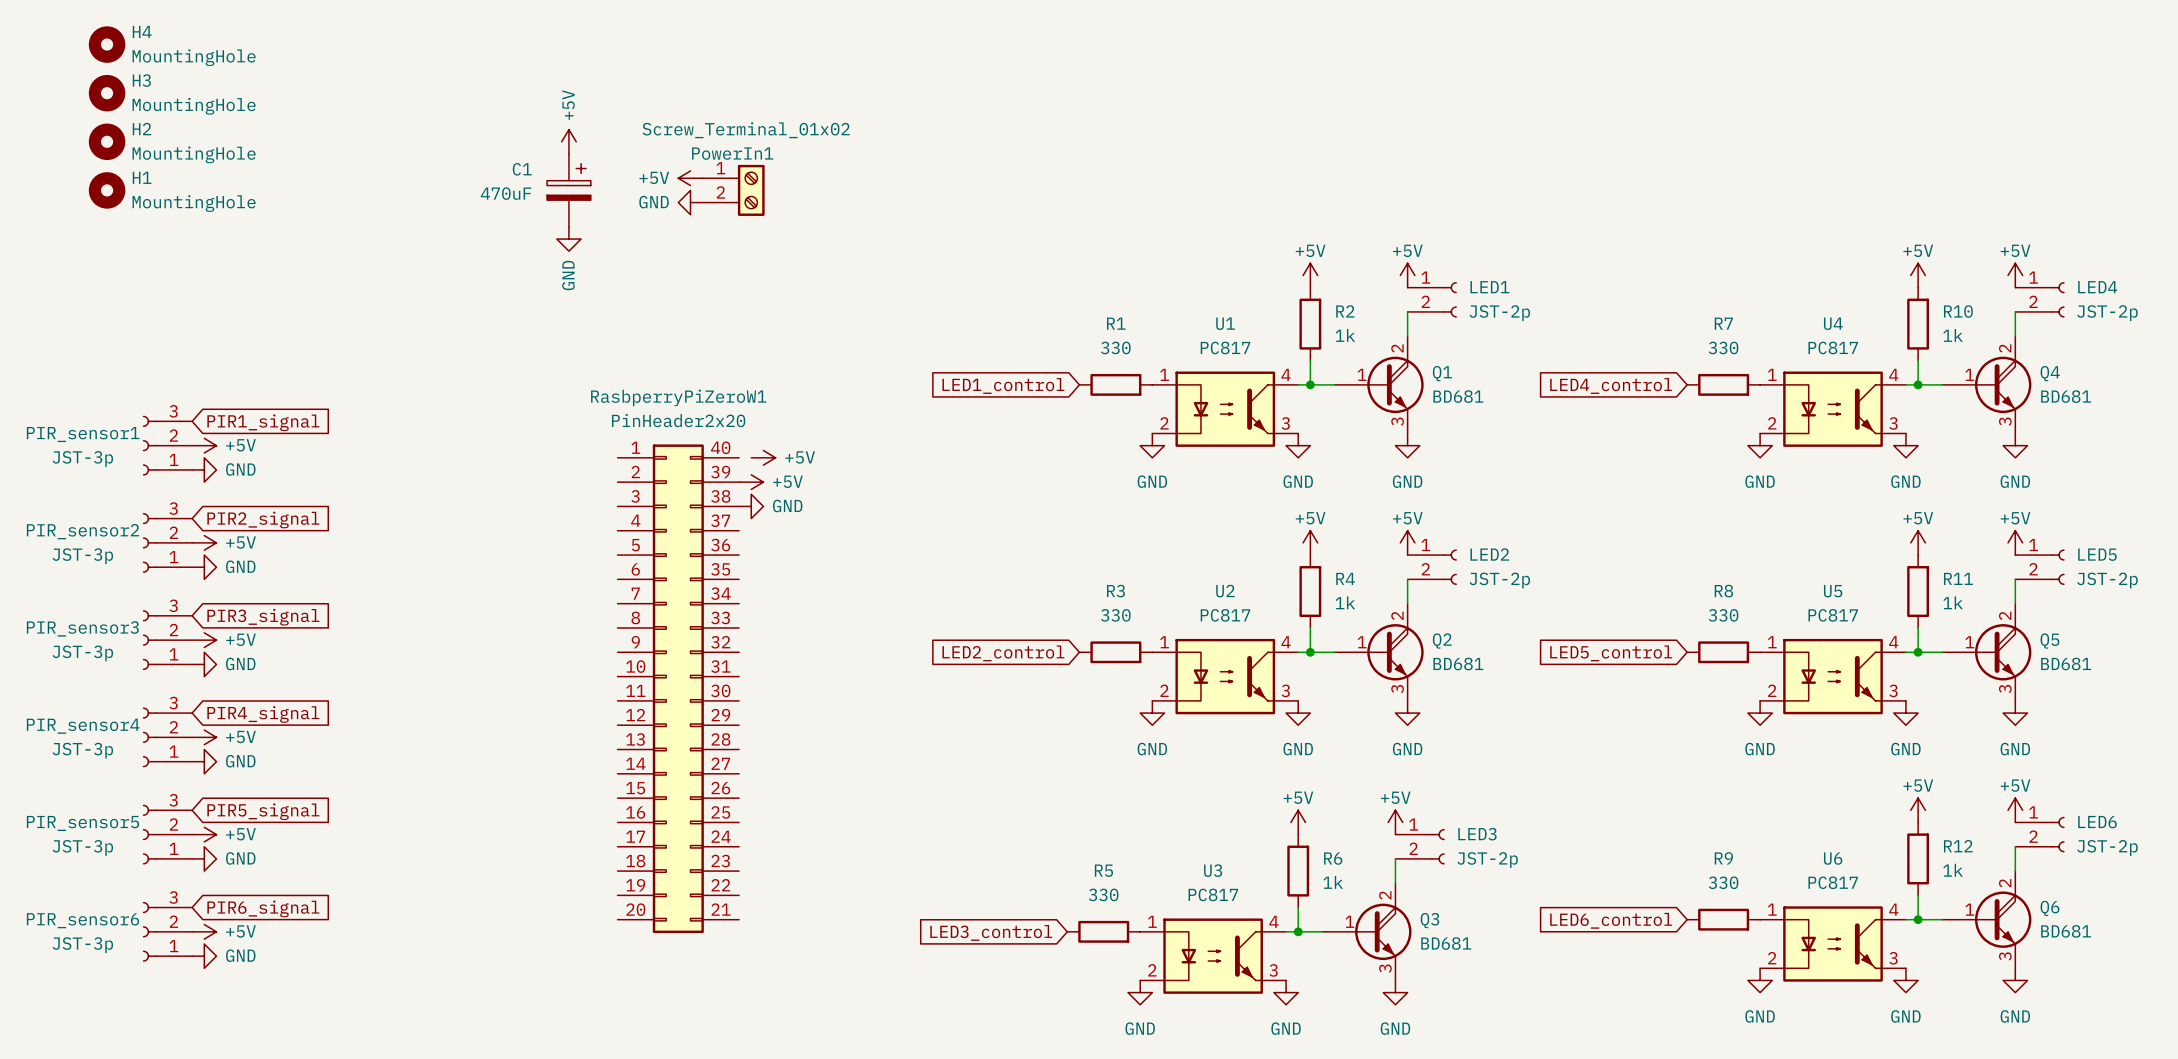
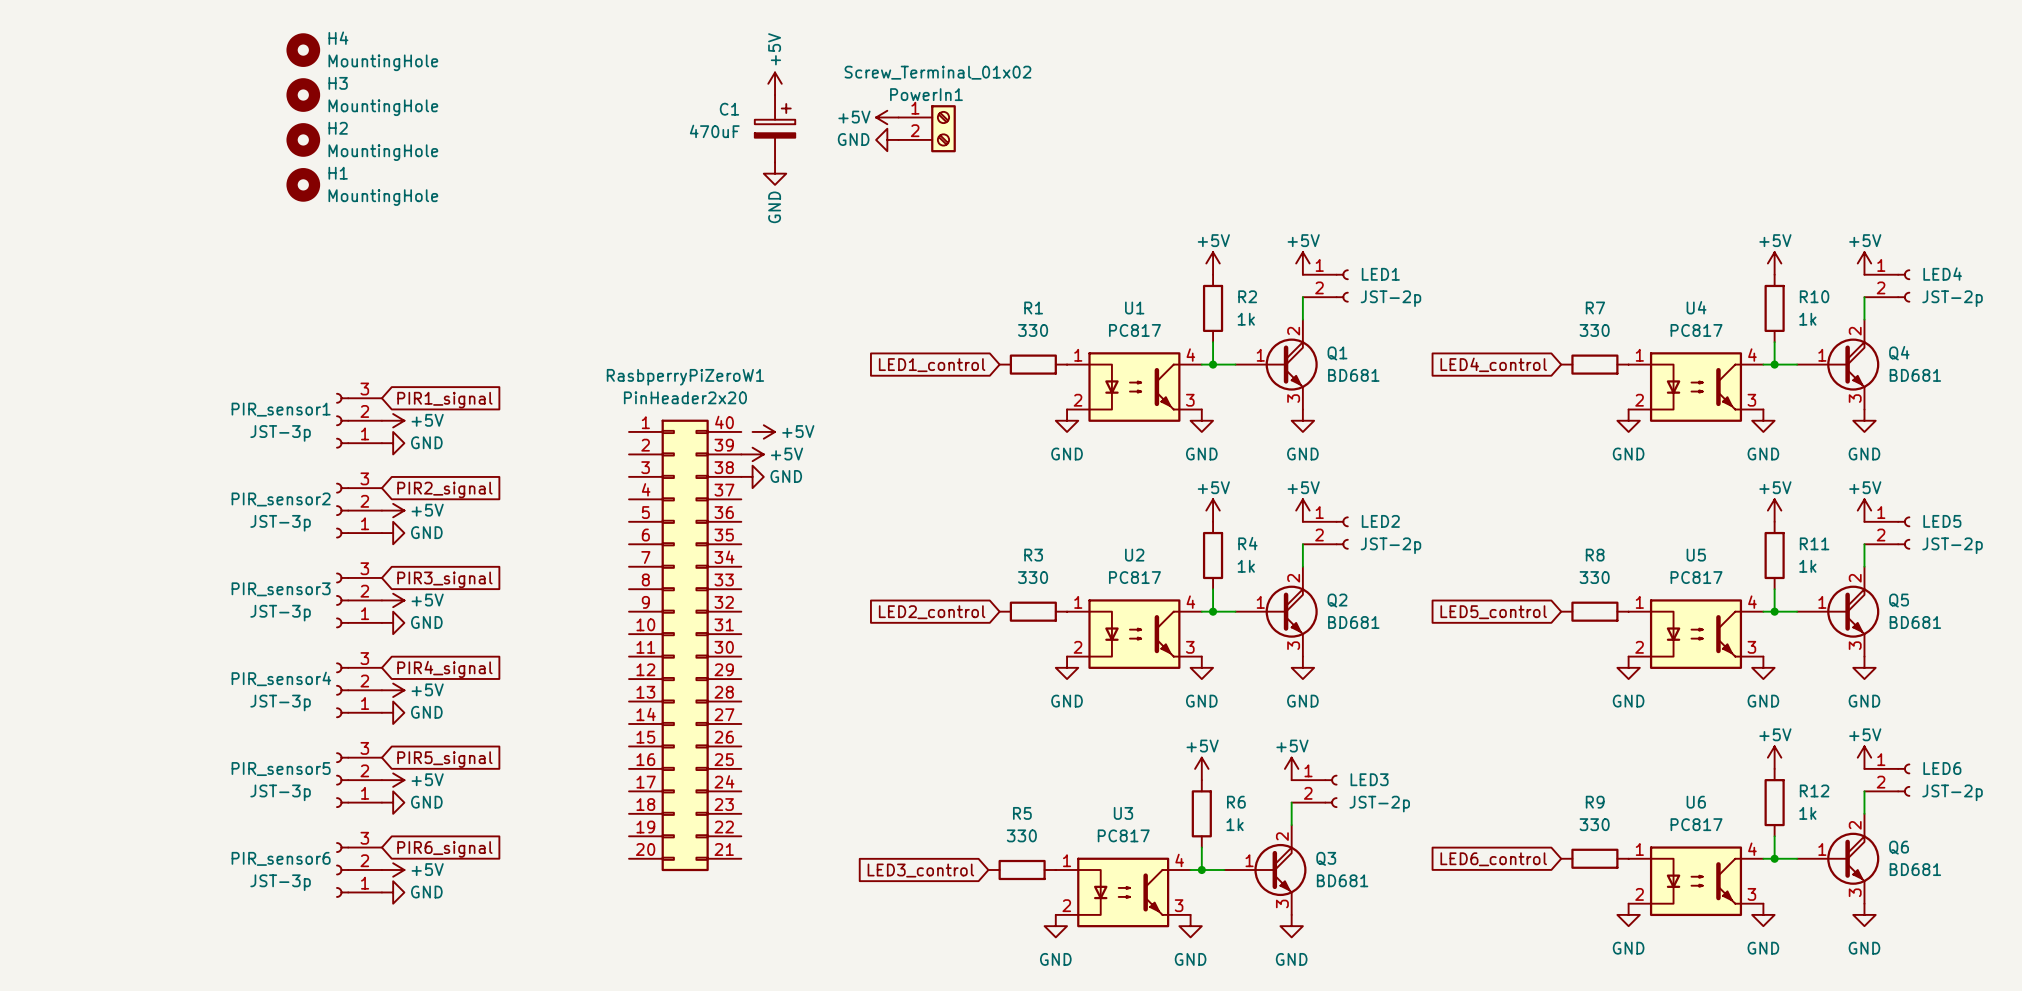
H4 position: (107, 44) -> (303, 50)
power symbol: none -> +5V (775, 83)
H3 position: (107, 93) -> (303, 95)
power symbol: none -> +5V (887, 117)
H2 position: (107, 141) -> (303, 139)
power symbol: +5V (568, 141) -> none
power symbol: none -> GND (887, 139)
power symbol: +5V (690, 178) -> none
power symbol: none -> GND (775, 173)
H1 position: (107, 190) -> (303, 184)
C1 position: (568, 190) -> (775, 128)
PowerIn1 position: (733, 190) -> (927, 128)
power symbol: GND (690, 202) -> none
power symbol: GND (568, 239) -> none
global label position: PIR1_signal (263, 422) -> PIR1_signal (444, 400)
PIR_sensor1 position: (167, 445) -> (359, 420)
power symbol: +5V (204, 445) -> none
power symbol: none -> +5V (393, 420)
power symbol: +5V (763, 457) -> none
power symbol: none -> +5V (763, 431)
power symbol: GND (204, 469) -> none
power symbol: none -> GND (393, 443)
power symbol: +5V (751, 482) -> none
power symbol: none -> +5V (752, 454)
power symbol position: GND (751, 506) -> GND (752, 476)
global label position: PIR2_signal (263, 520) -> PIR2_signal (444, 490)
PIR_sensor2 position: (167, 542) -> (359, 510)
power symbol: +5V (204, 542) -> none
power symbol: none -> +5V (393, 510)
power symbol: GND (204, 567) -> none
power symbol: none -> GND (393, 533)
global label position: PIR3_signal (263, 617) -> PIR3_signal (444, 579)
PIR_sensor3 position: (167, 640) -> (359, 600)
power symbol: +5V (204, 640) -> none
power symbol: none -> +5V (393, 600)
power symbol: GND (204, 664) -> none
power symbol: none -> GND (393, 622)
RasbperryPiZeroW1 position: (678, 688) -> (685, 645)
global label position: PIR4_signal (263, 714) -> PIR4_signal (444, 669)
PIR_sensor4 position: (167, 737) -> (359, 690)
power symbol: +5V (204, 737) -> none
power symbol: none -> +5V (393, 690)
power symbol: GND (204, 761) -> none
power symbol: none -> GND (393, 712)
global label position: PIR5_signal (263, 811) -> PIR5_signal (444, 759)
PIR_sensor5 position: (167, 834) -> (359, 780)
power symbol: +5V (204, 834) -> none
power symbol: none -> +5V (393, 780)
power symbol: GND (204, 858) -> none
power symbol: none -> GND (393, 802)
global label position: PIR6_signal (263, 908) -> PIR6_signal (444, 849)
PIR_sensor6 position: (167, 931) -> (359, 869)
power symbol: +5V (204, 931) -> none
power symbol: none -> +5V (393, 869)
power symbol: GND (204, 956) -> none
power symbol: none -> GND (393, 892)

